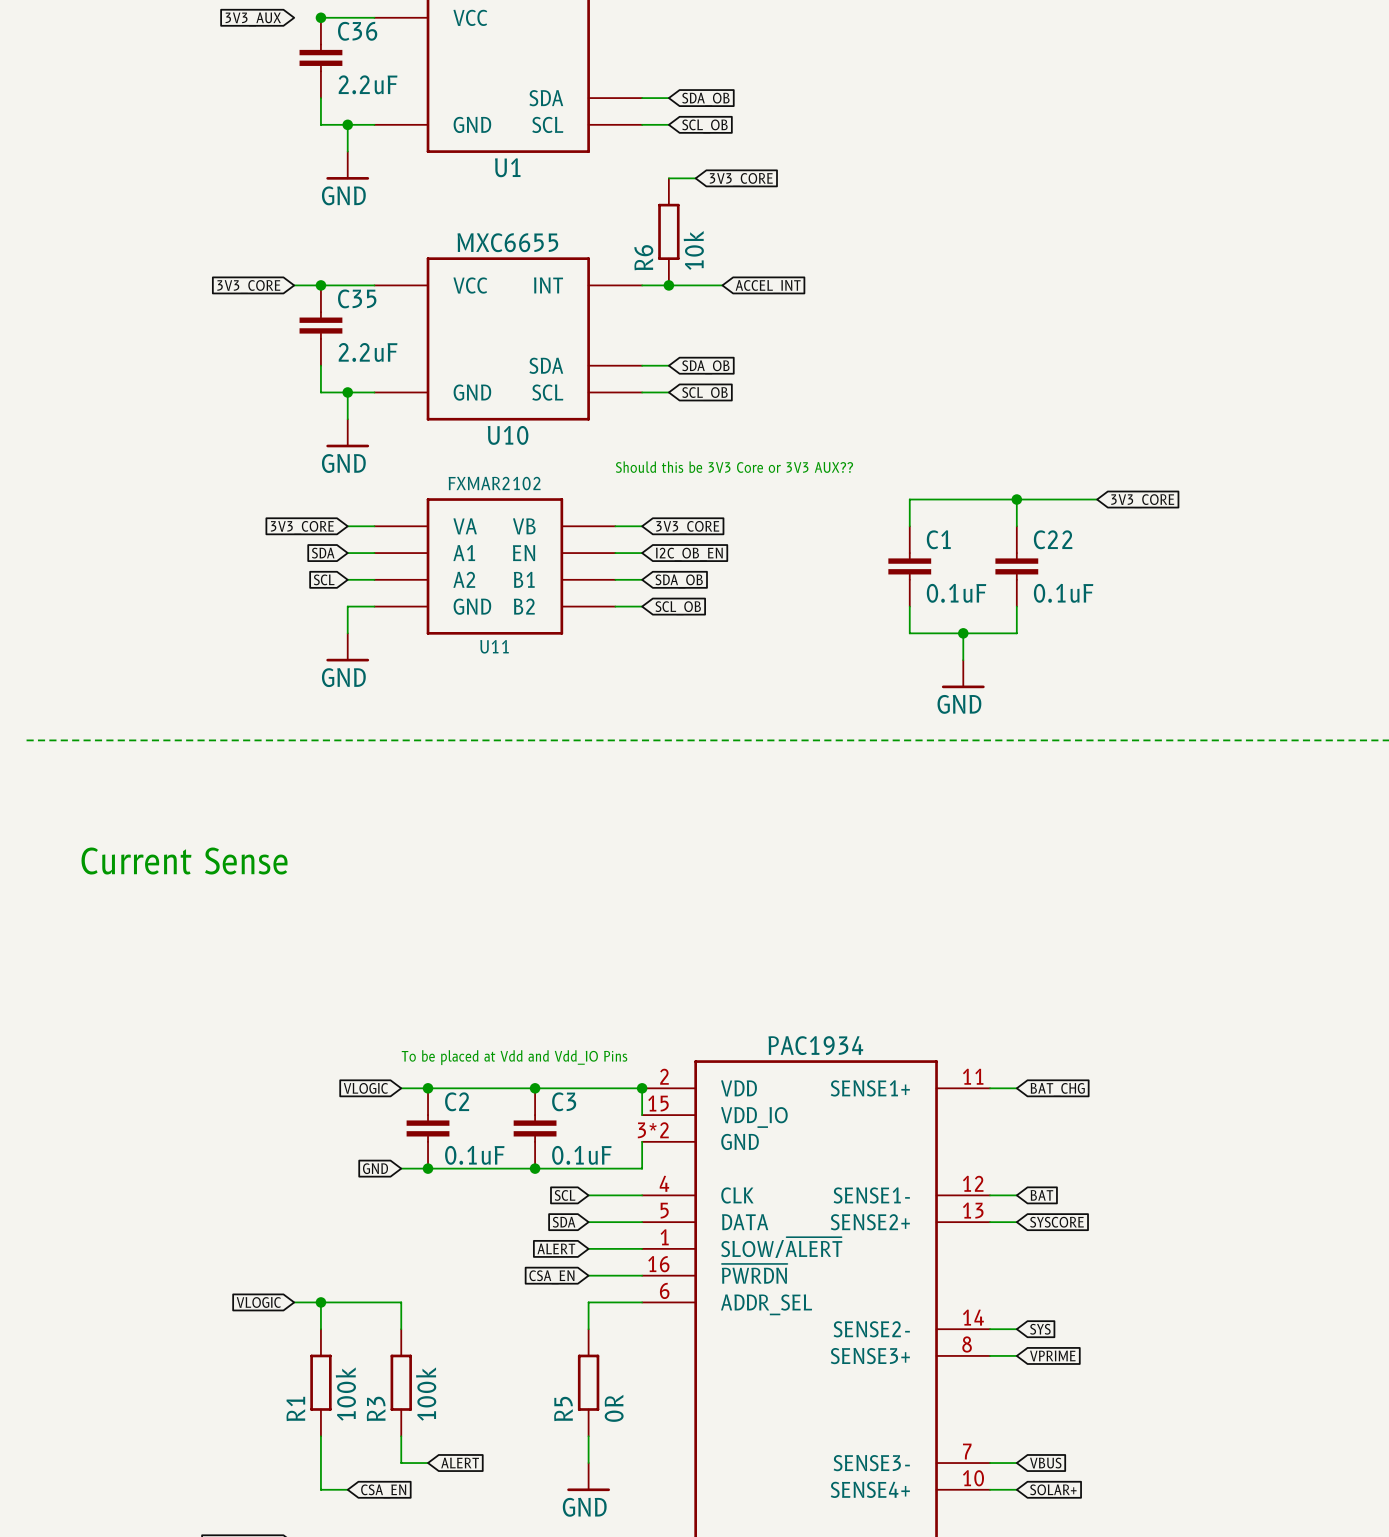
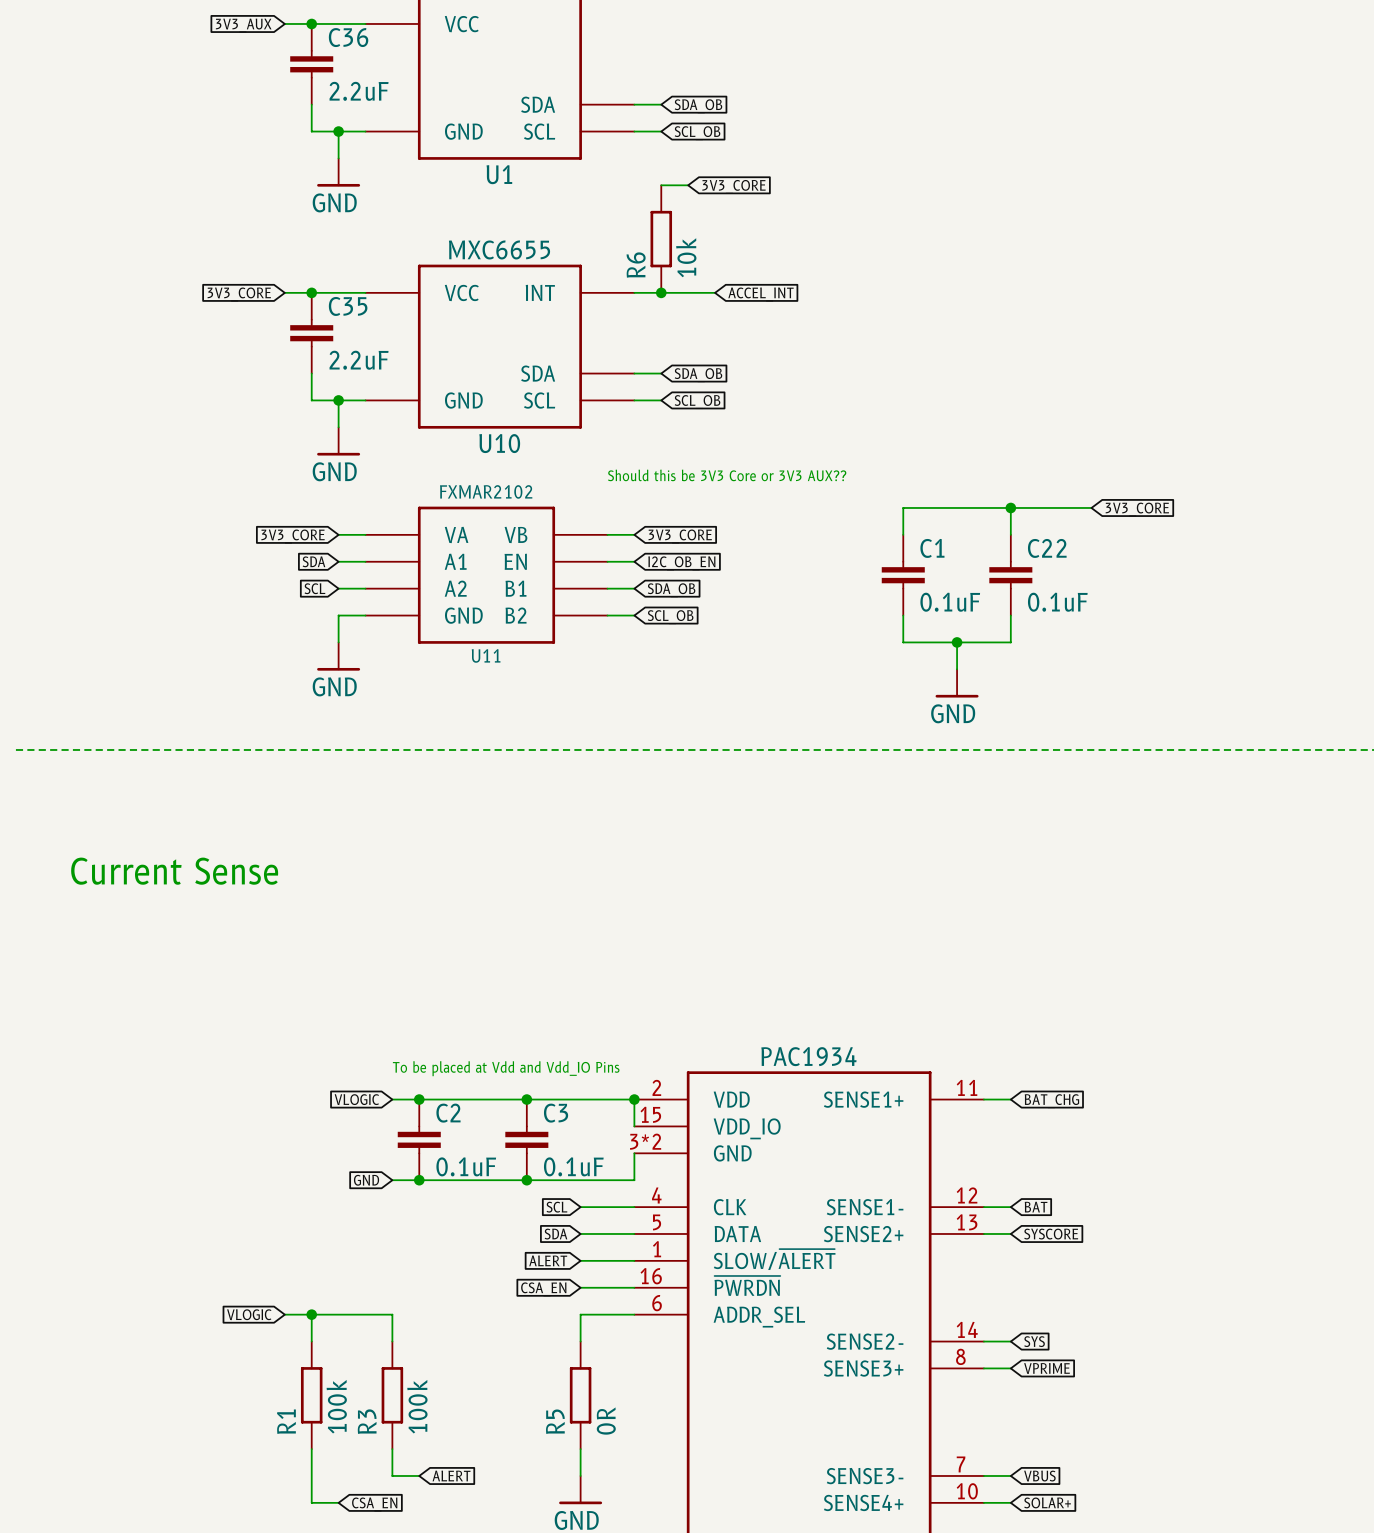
wire: none -> (284, 23) (311, 23)

